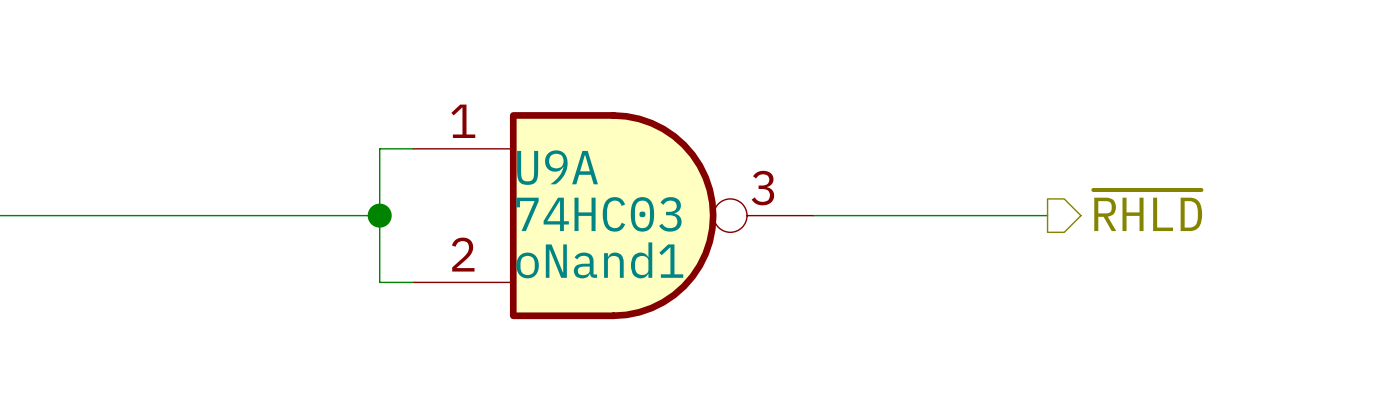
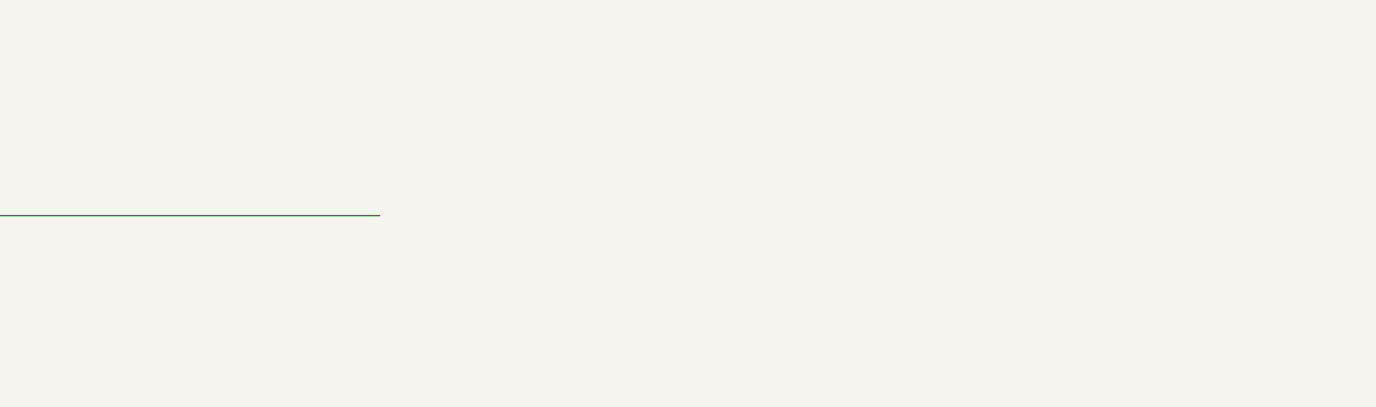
wire: (413, 148) (379, 148) (379, 282) (413, 282) -> none
hierarchical label: ~{RHLD} (1147, 210) -> none
junction: (379, 215) -> none
U9A: 74HC03 (613, 215) -> none
wire: (813, 215) (1047, 215) -> none

